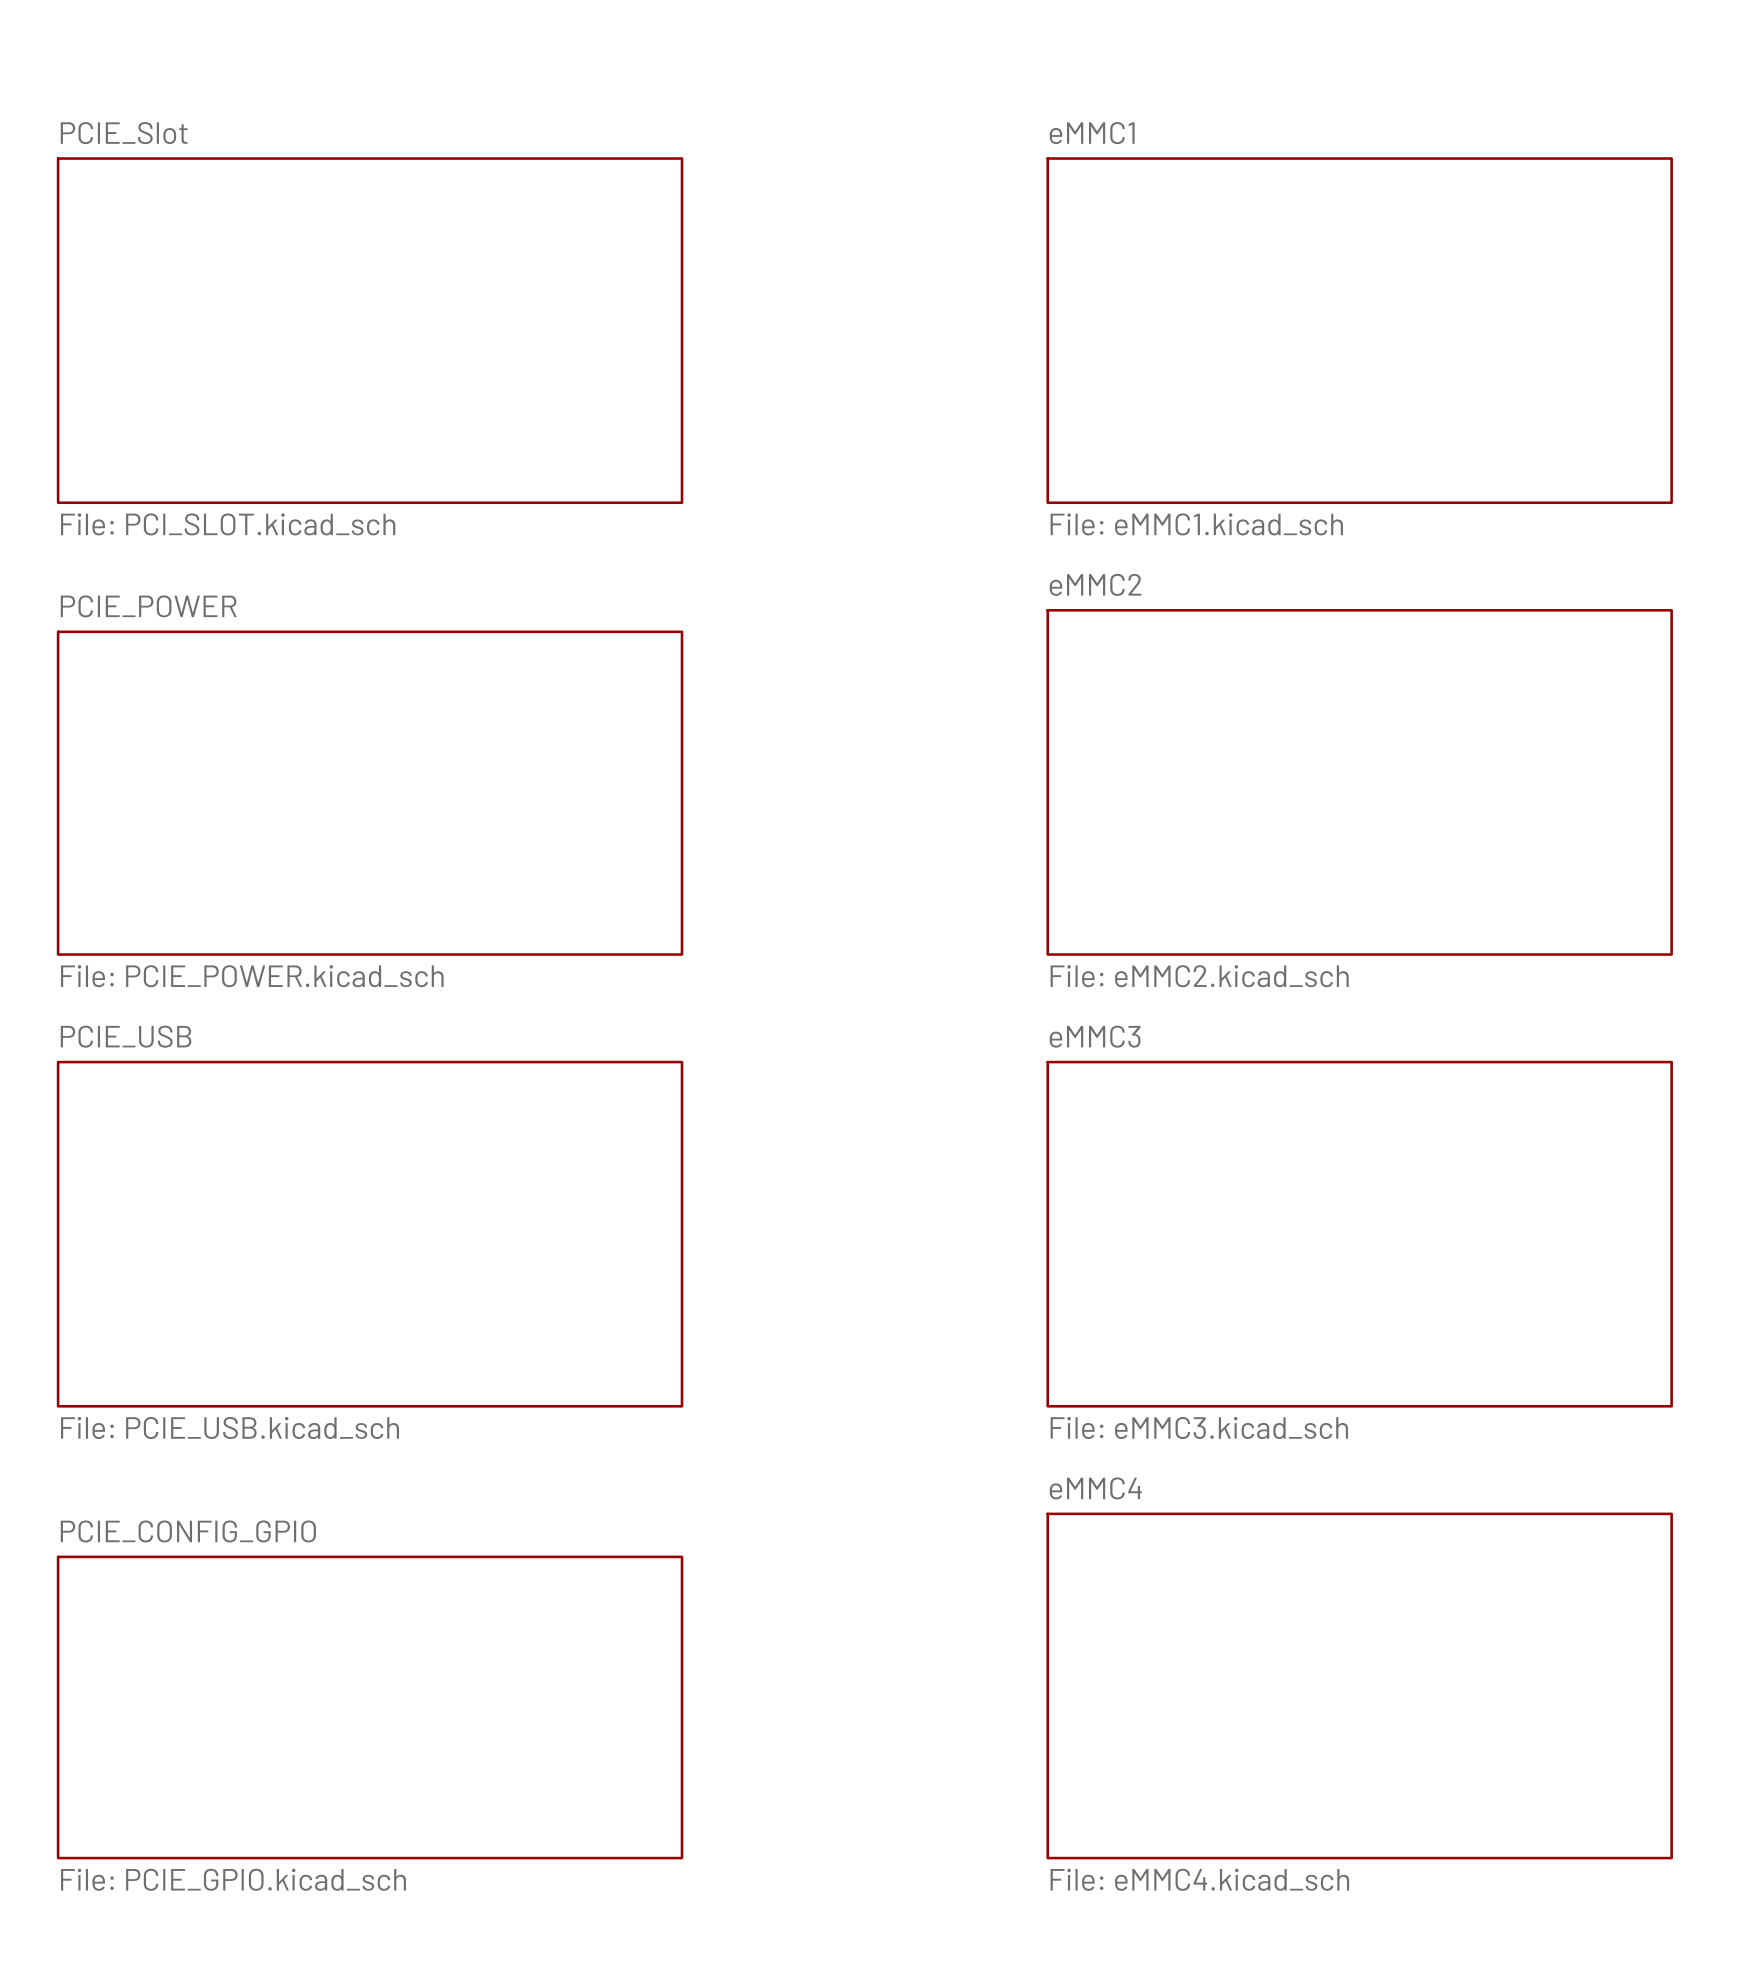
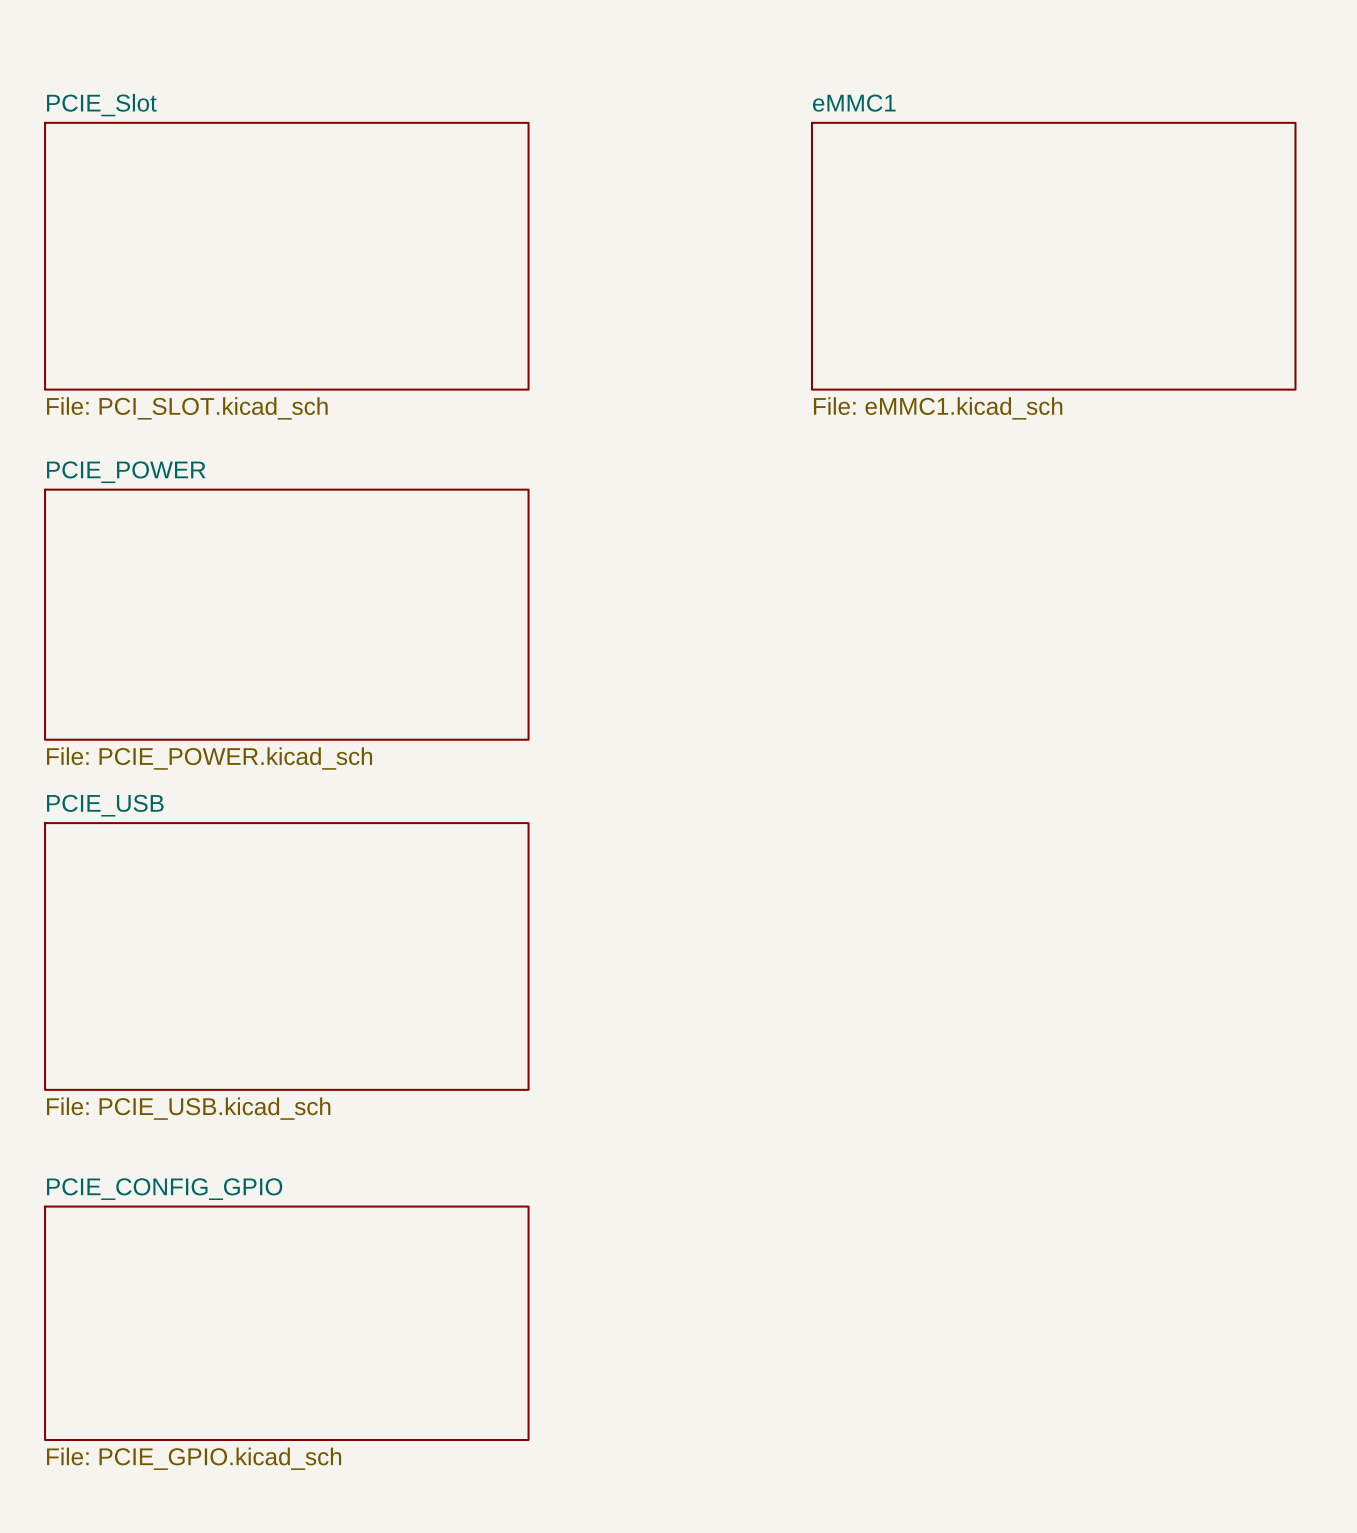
sheet eMMC2: File: eMMC2.kicad_sch (1359, 782) -> none
sheet eMMC3: File: eMMC3.kicad_sch (1359, 1234) -> none
sheet eMMC4: File: eMMC4.kicad_sch (1359, 1685) -> none

